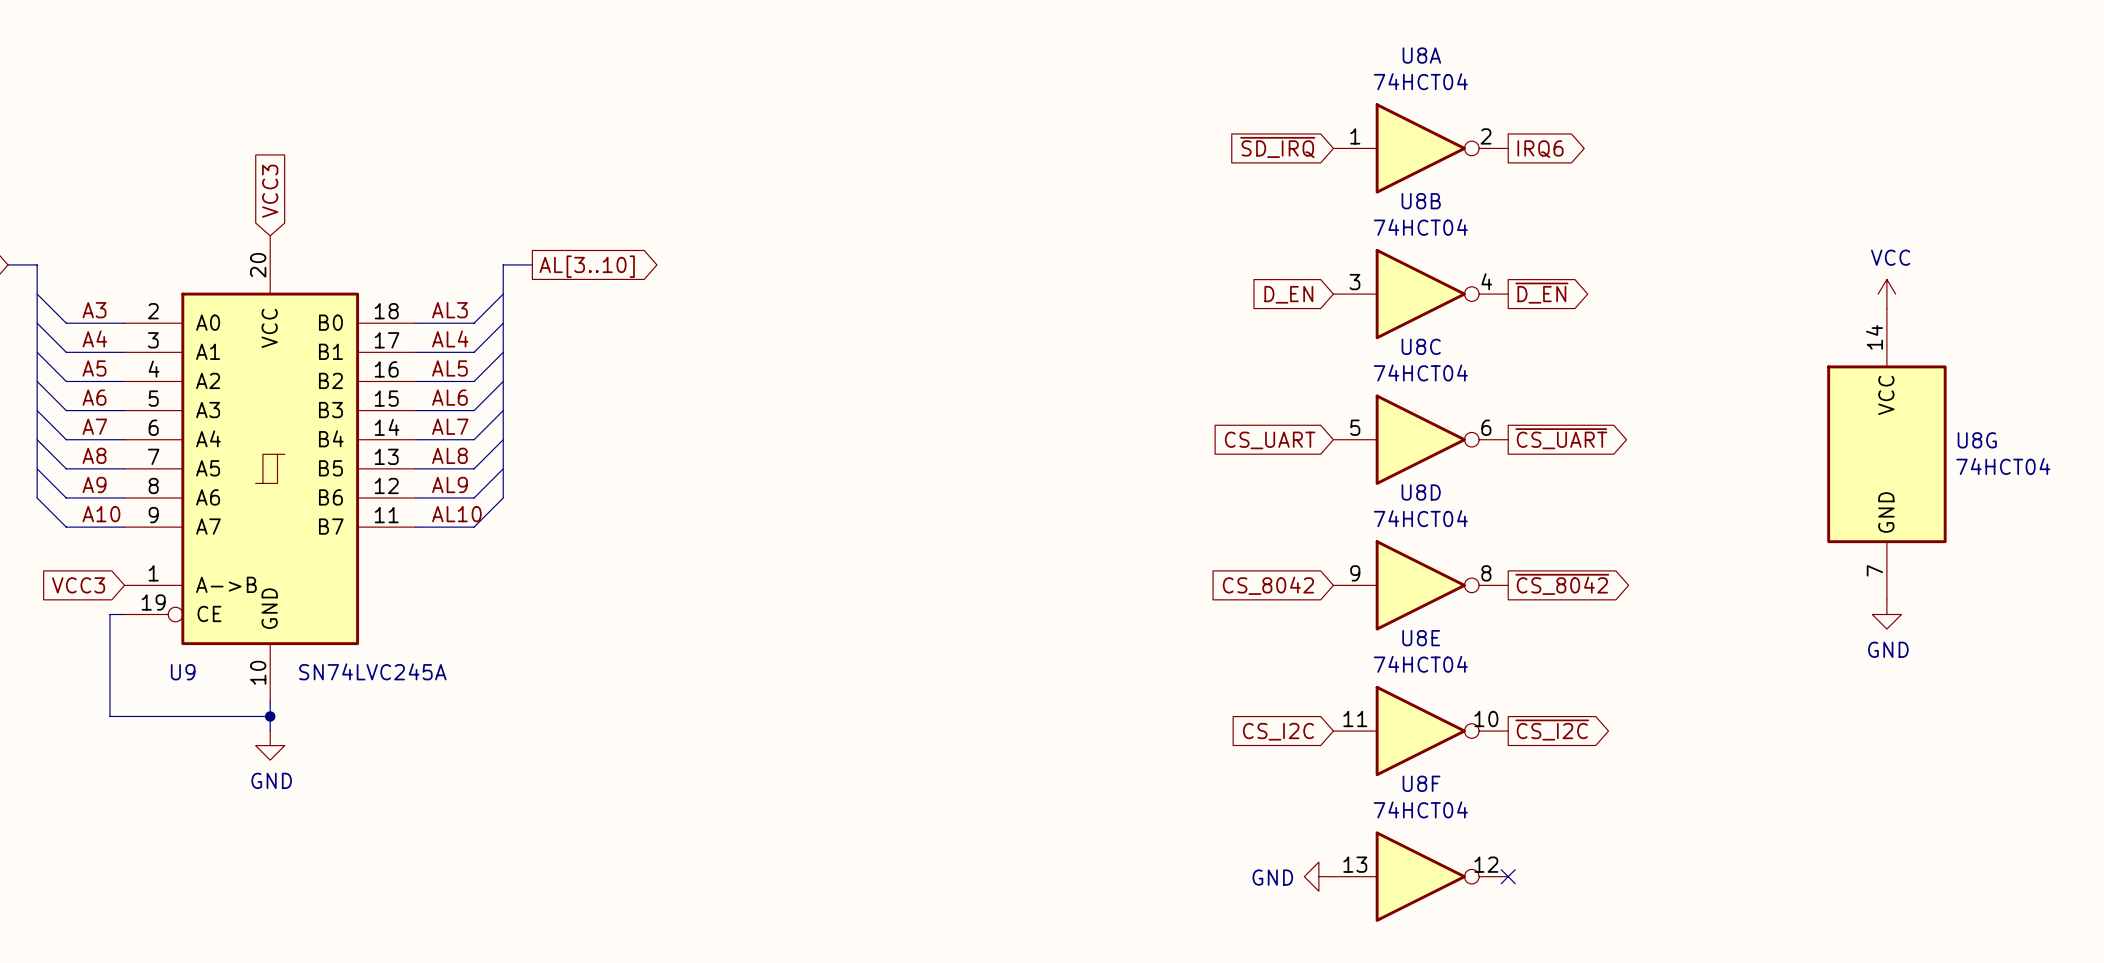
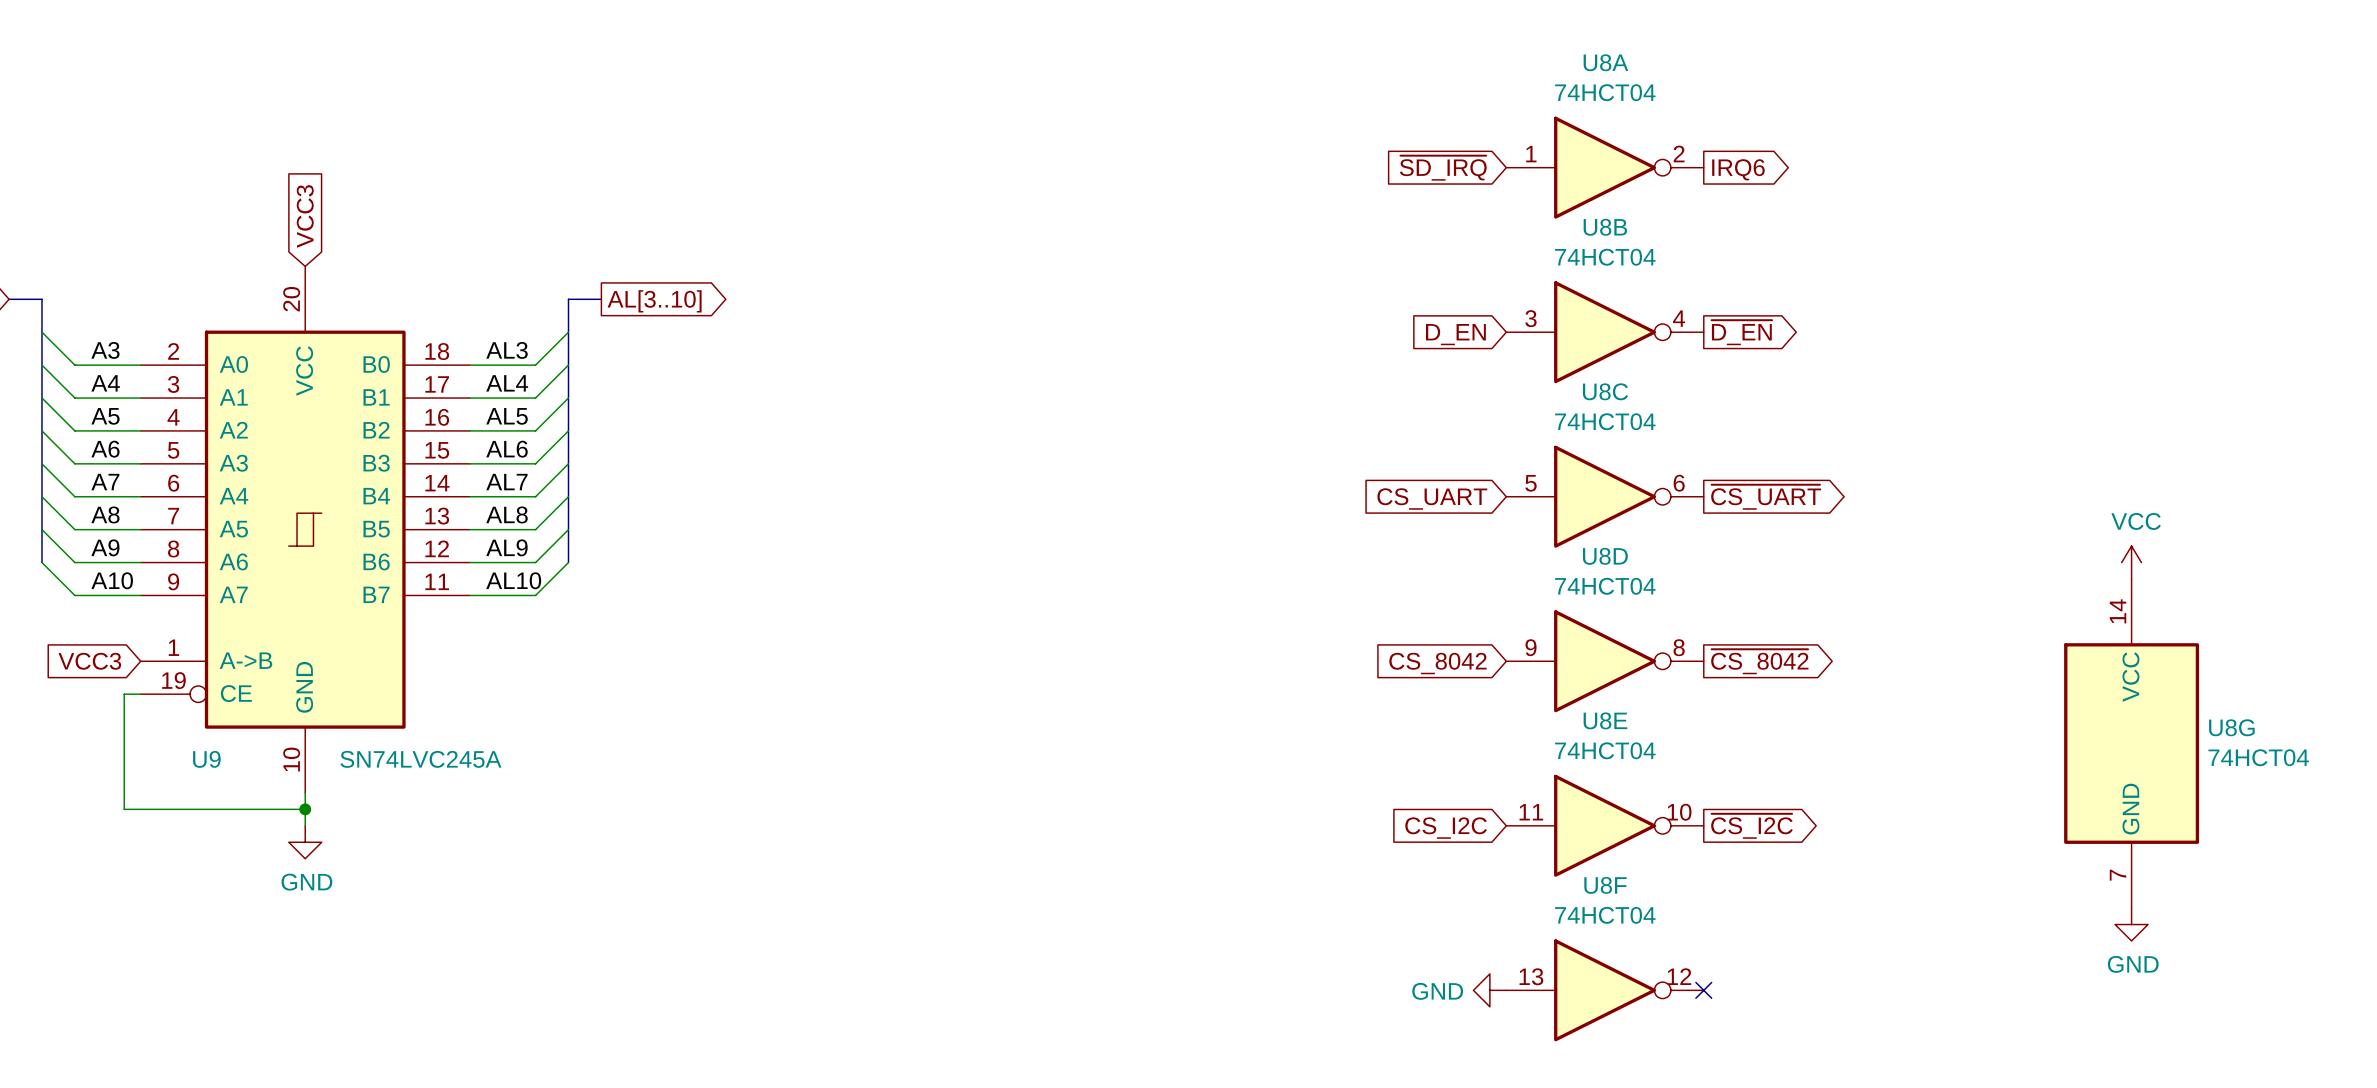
power symbol position: VCC (1886, 294) -> VCC (2131, 562)
U8G position: (1886, 454) -> (2131, 743)
power symbol position: GND (1886, 614) -> GND (2131, 924)

